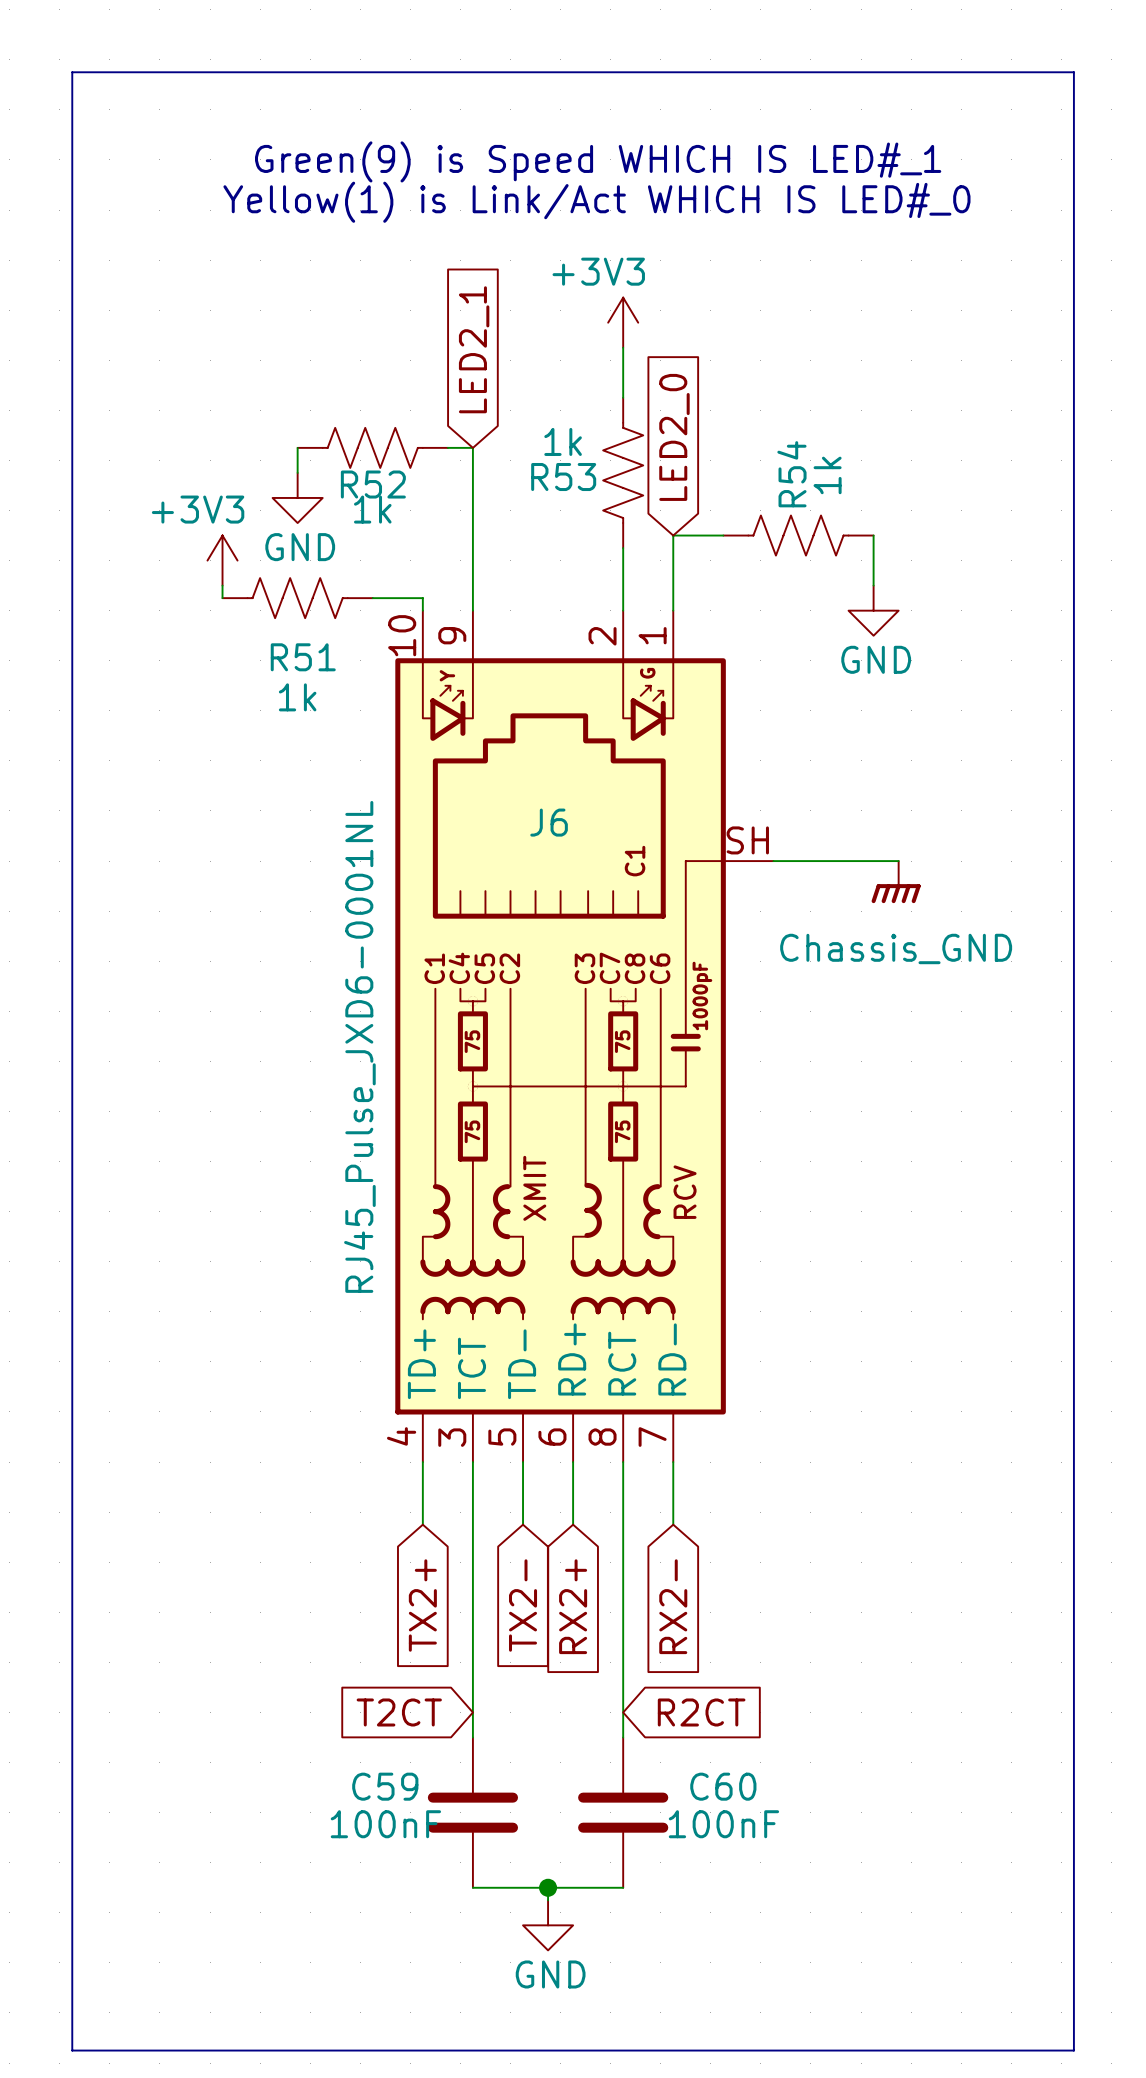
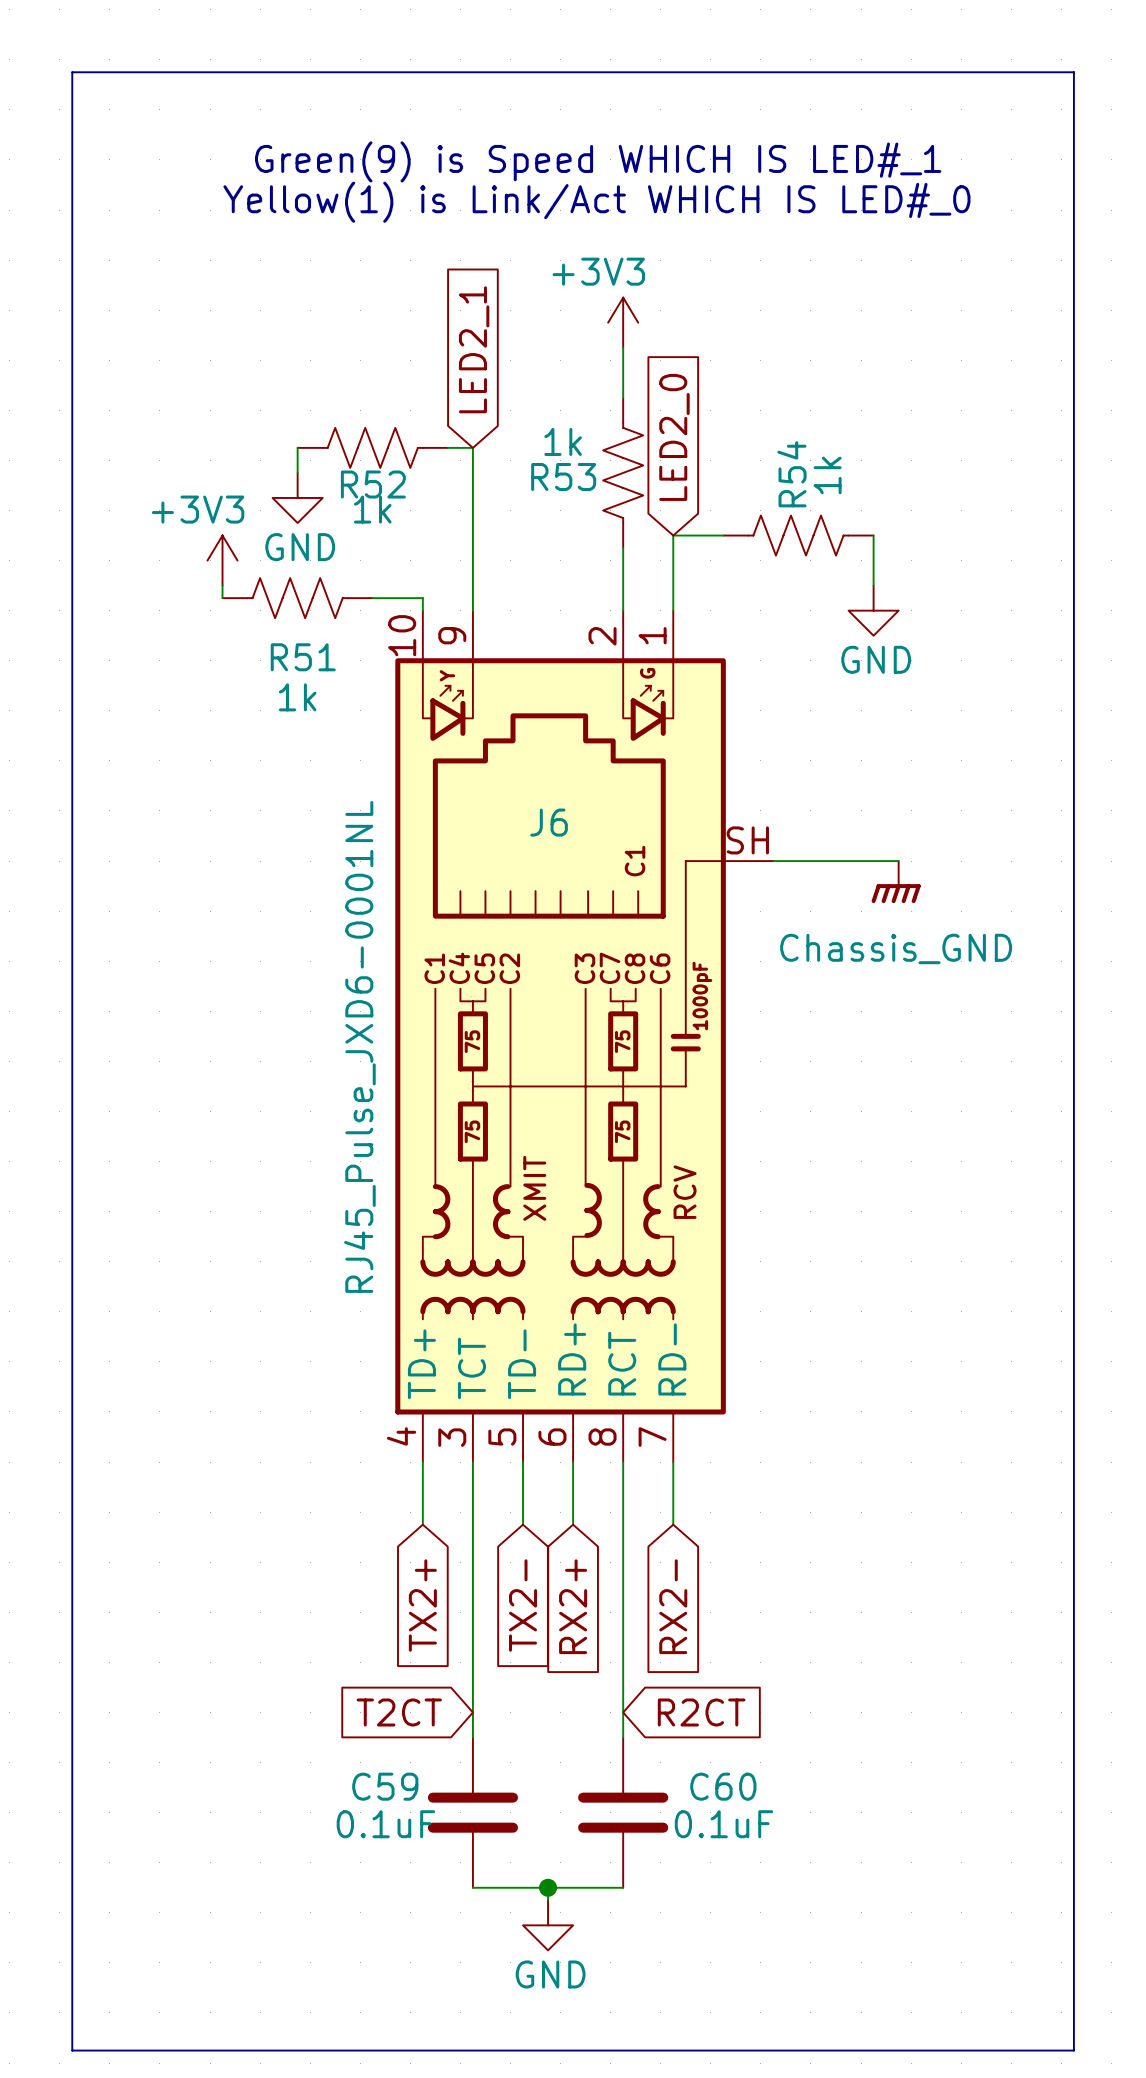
C59 value: 100nF (385, 1824) -> 0.1uF (385, 1824)
C60 value: 100nF (723, 1824) -> 0.1uF (723, 1824)

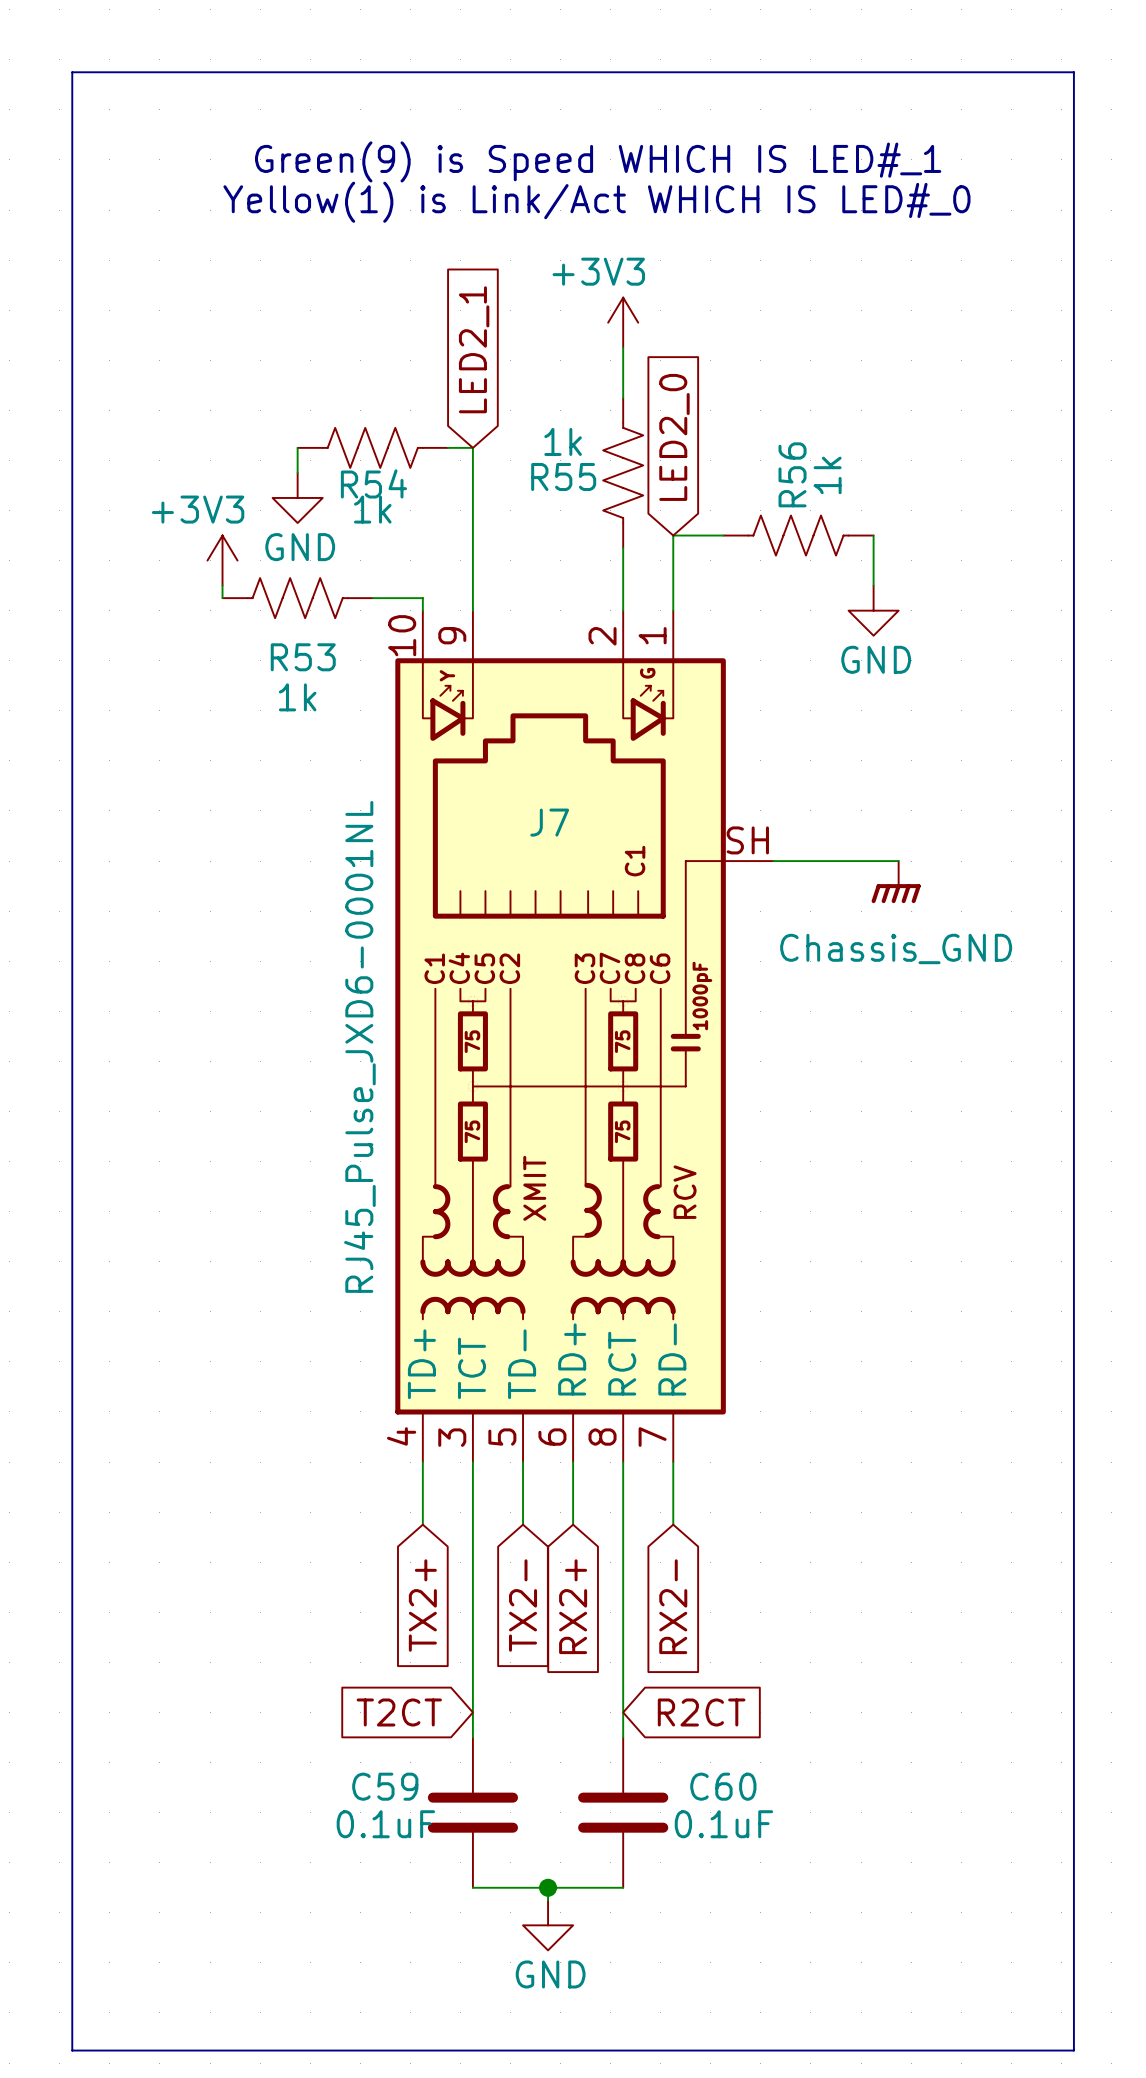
R54 name: R54 (791, 474) -> R56 (792, 474)
R53 name: R53 (563, 477) -> R55 (563, 477)
R52 name: R52 (373, 484) -> R54 (373, 483)
R51 name: R51 (303, 657) -> R53 (303, 657)
J6 name: J6 (549, 822) -> J7 (549, 822)

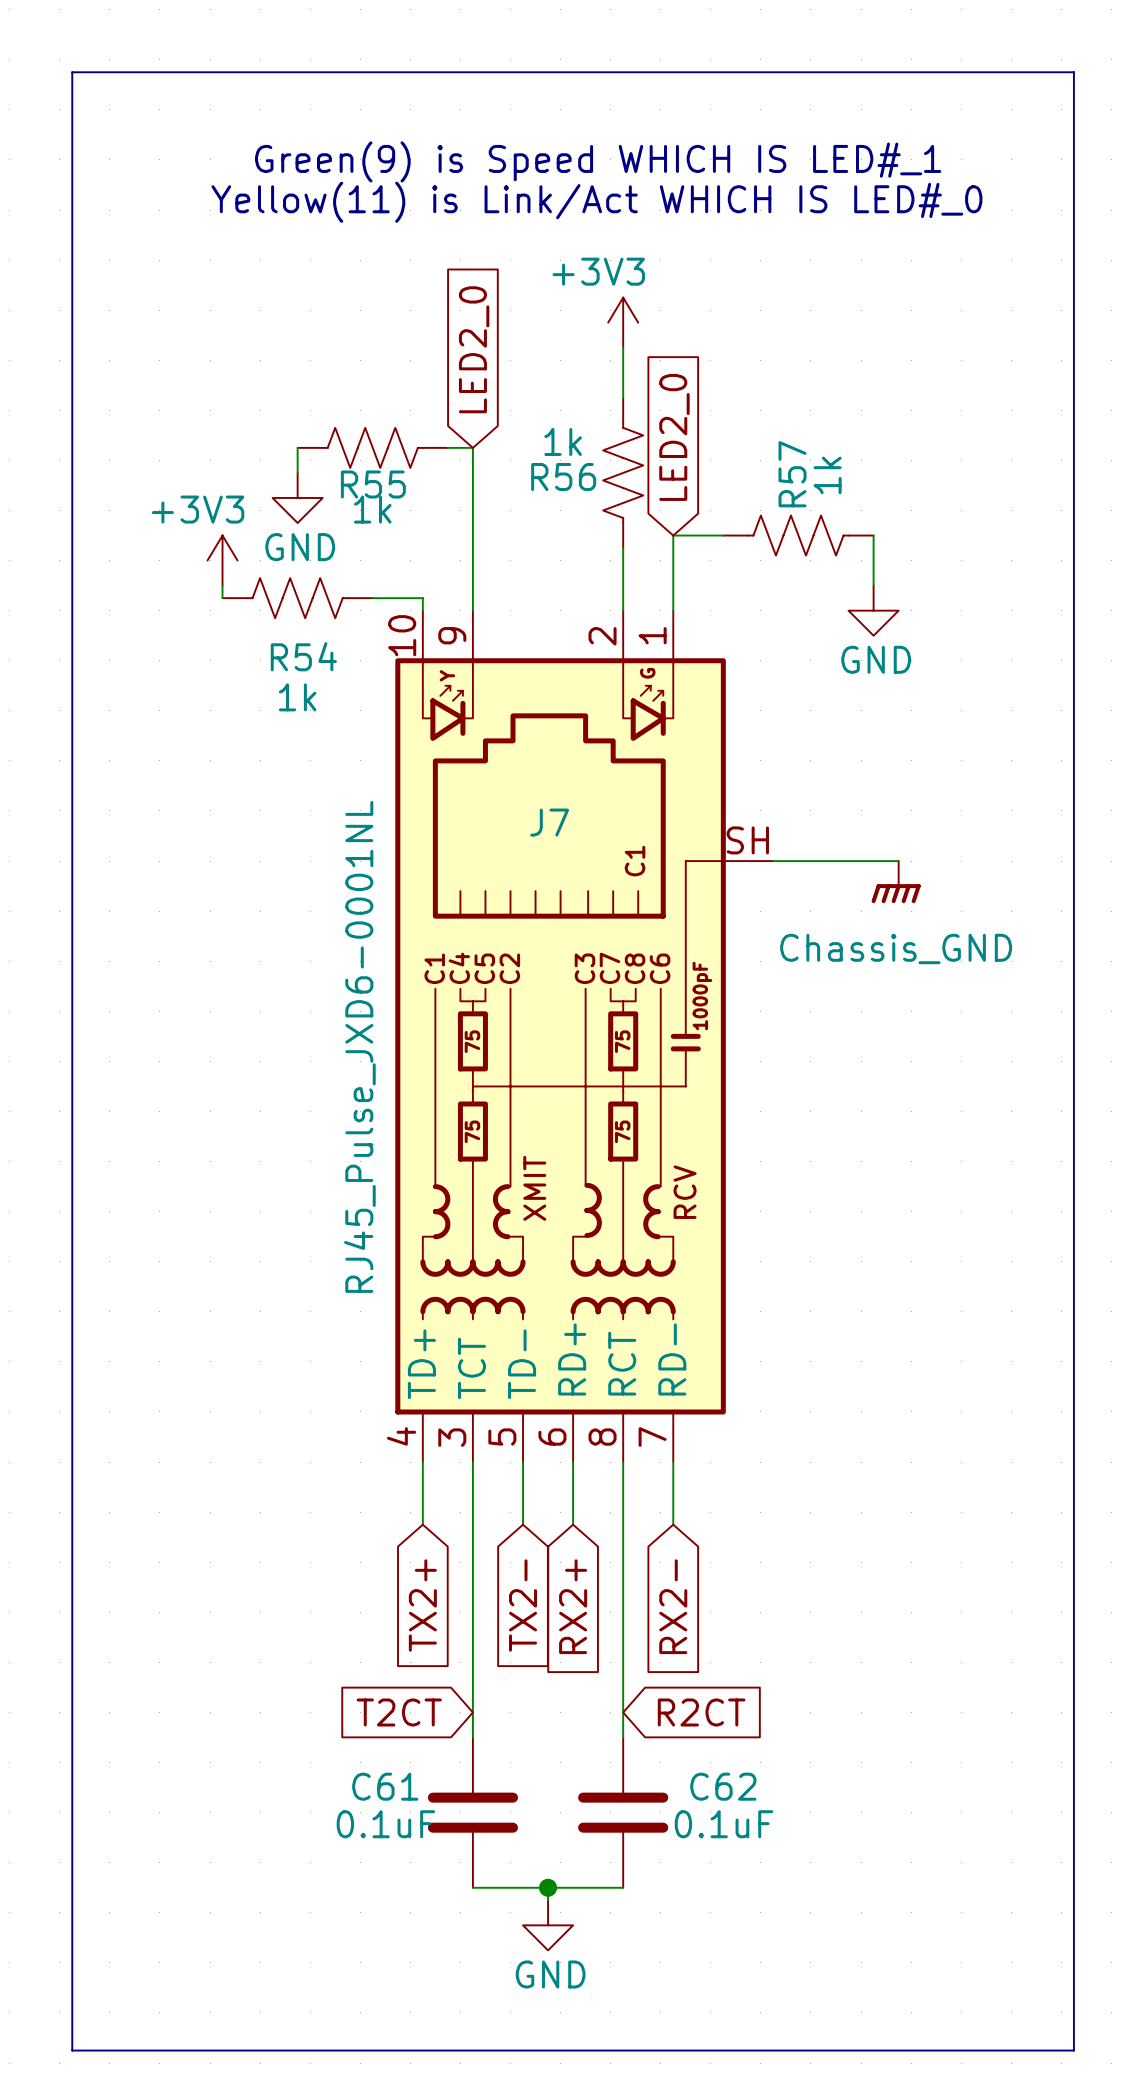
text: Yellow(1) is Link/Act WHICH IS LED#_0 (596, 202) -> Yellow(11) is Link/Act WHICH IS LED#_0 (596, 202)
global label: LED2_1 (474, 349) -> LED2_0 (474, 349)
R56 name: R56 (792, 474) -> R57 (792, 474)
R55 name: R55 (563, 477) -> R56 (563, 477)
R54 name: R54 (373, 483) -> R55 (373, 484)
R53 name: R53 (303, 657) -> R54 (303, 656)
C59 name: C59 (385, 1786) -> C61 (385, 1786)
C60 name: C60 (723, 1786) -> C62 (723, 1786)

